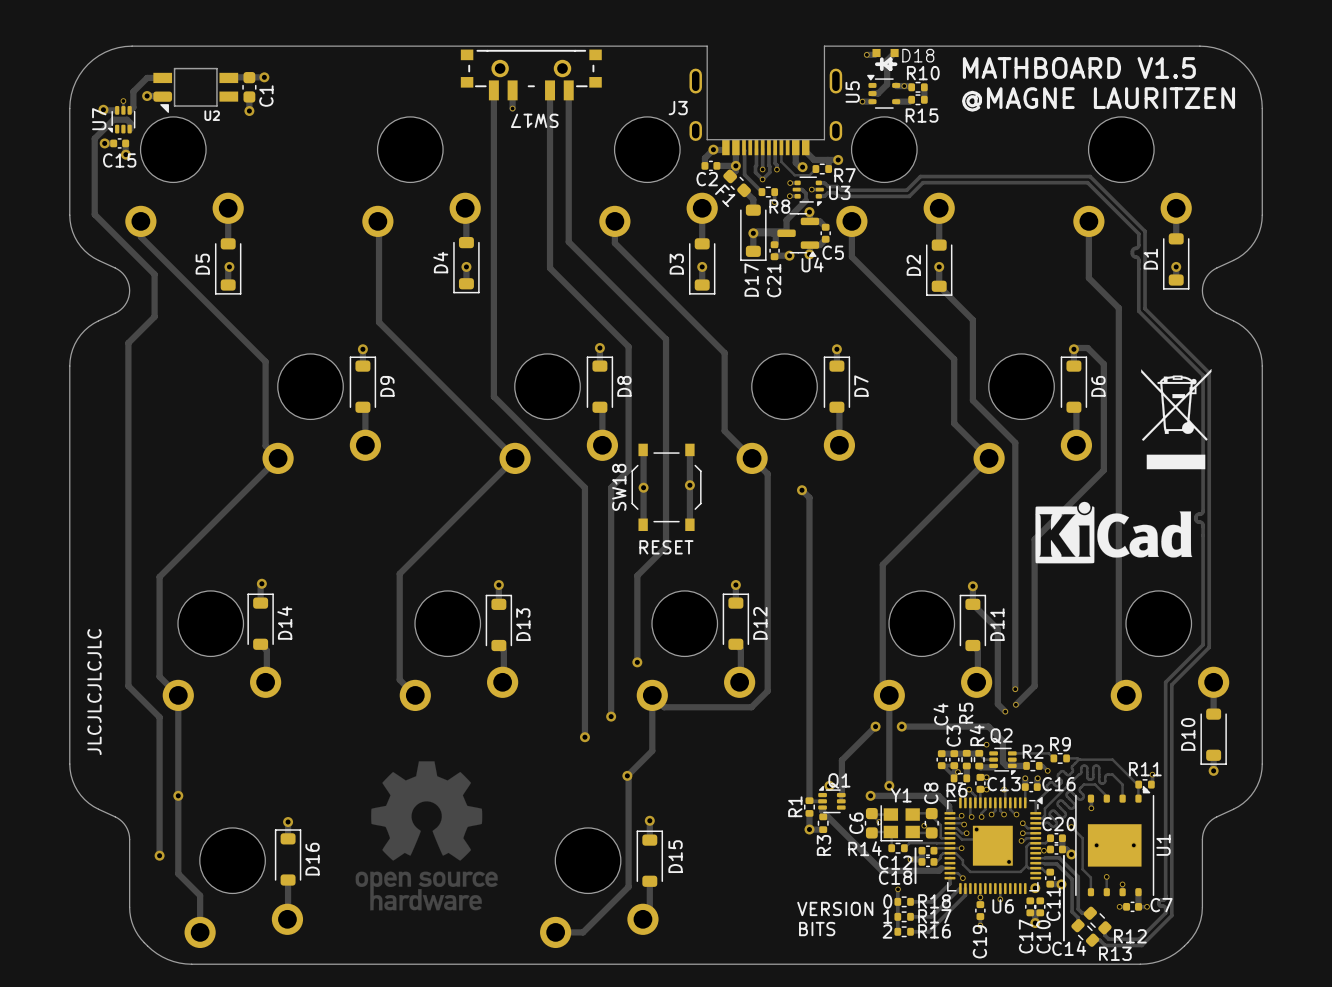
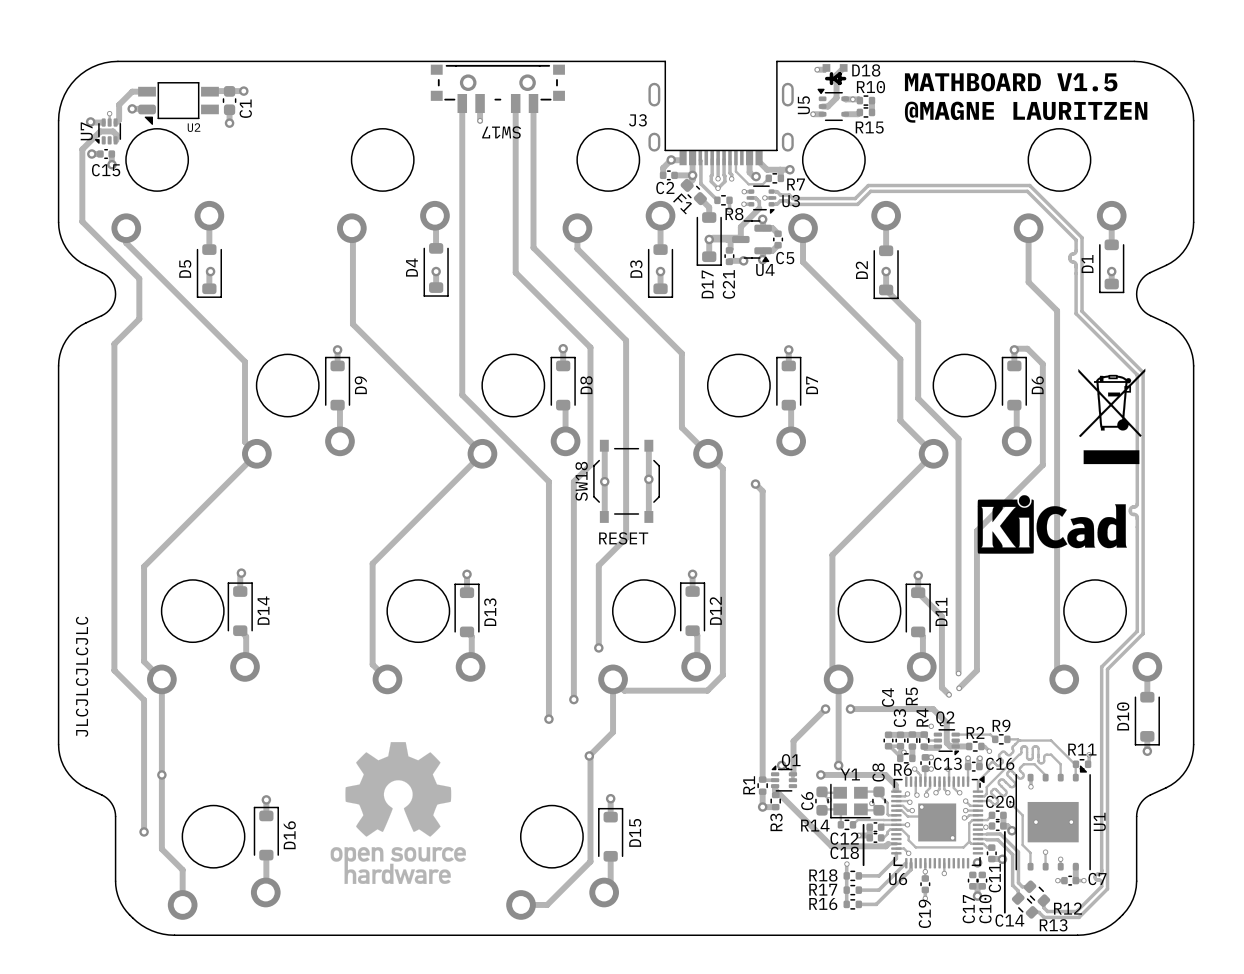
line: none -> (863, 858) (863, 865)
text: 0 (887, 901) -> none
R18 name position: R18 (934, 901) -> R18 (823, 875)
U6 name position: U6 (1003, 906) -> U6 (898, 879)
text: VERSION (835, 908) -> none
text: 1 (887, 916) -> none
R17 name position: R17 (934, 916) -> R17 (823, 889)
text: BITS (817, 929) -> none
text: 2 (887, 931) -> none
R16 name position: R16 (934, 931) -> R16 (823, 904)

